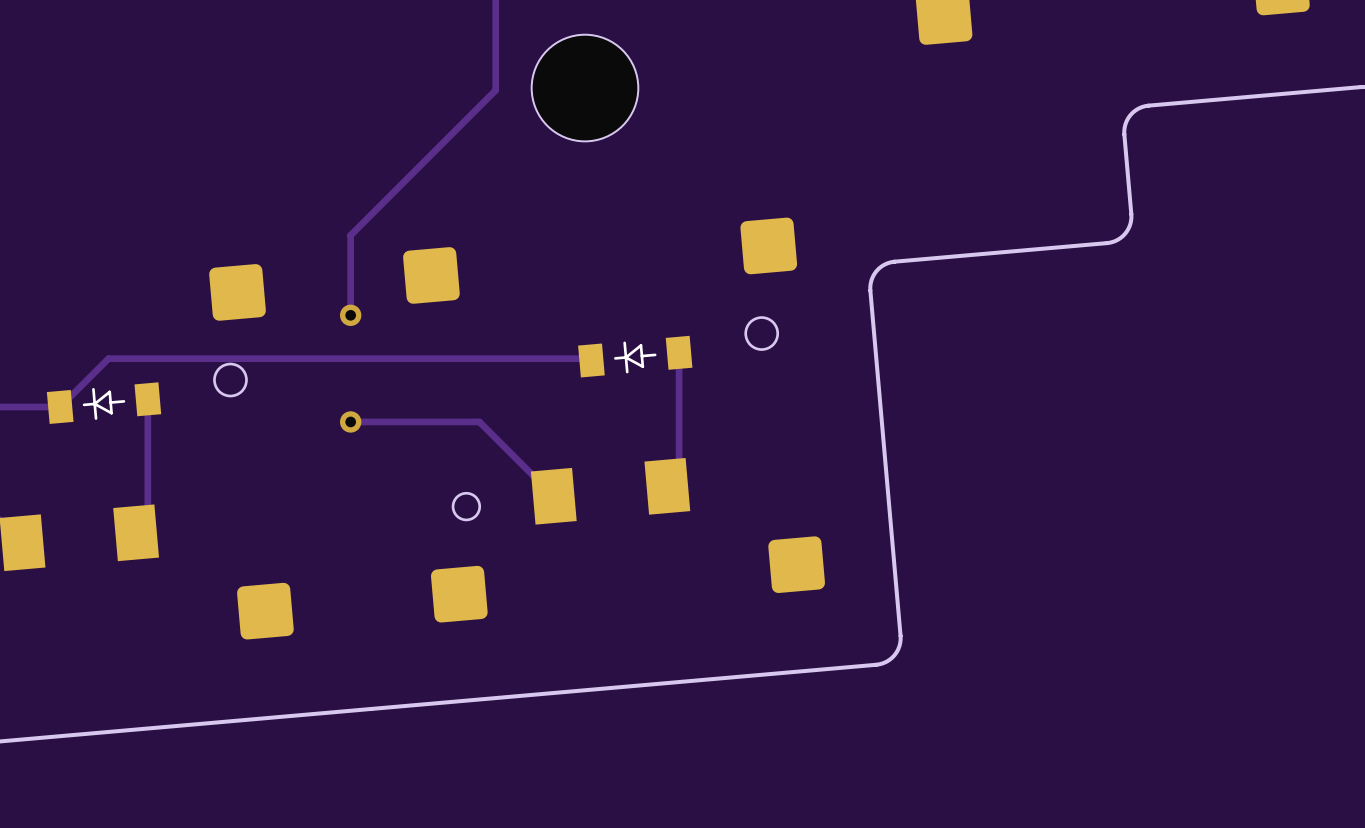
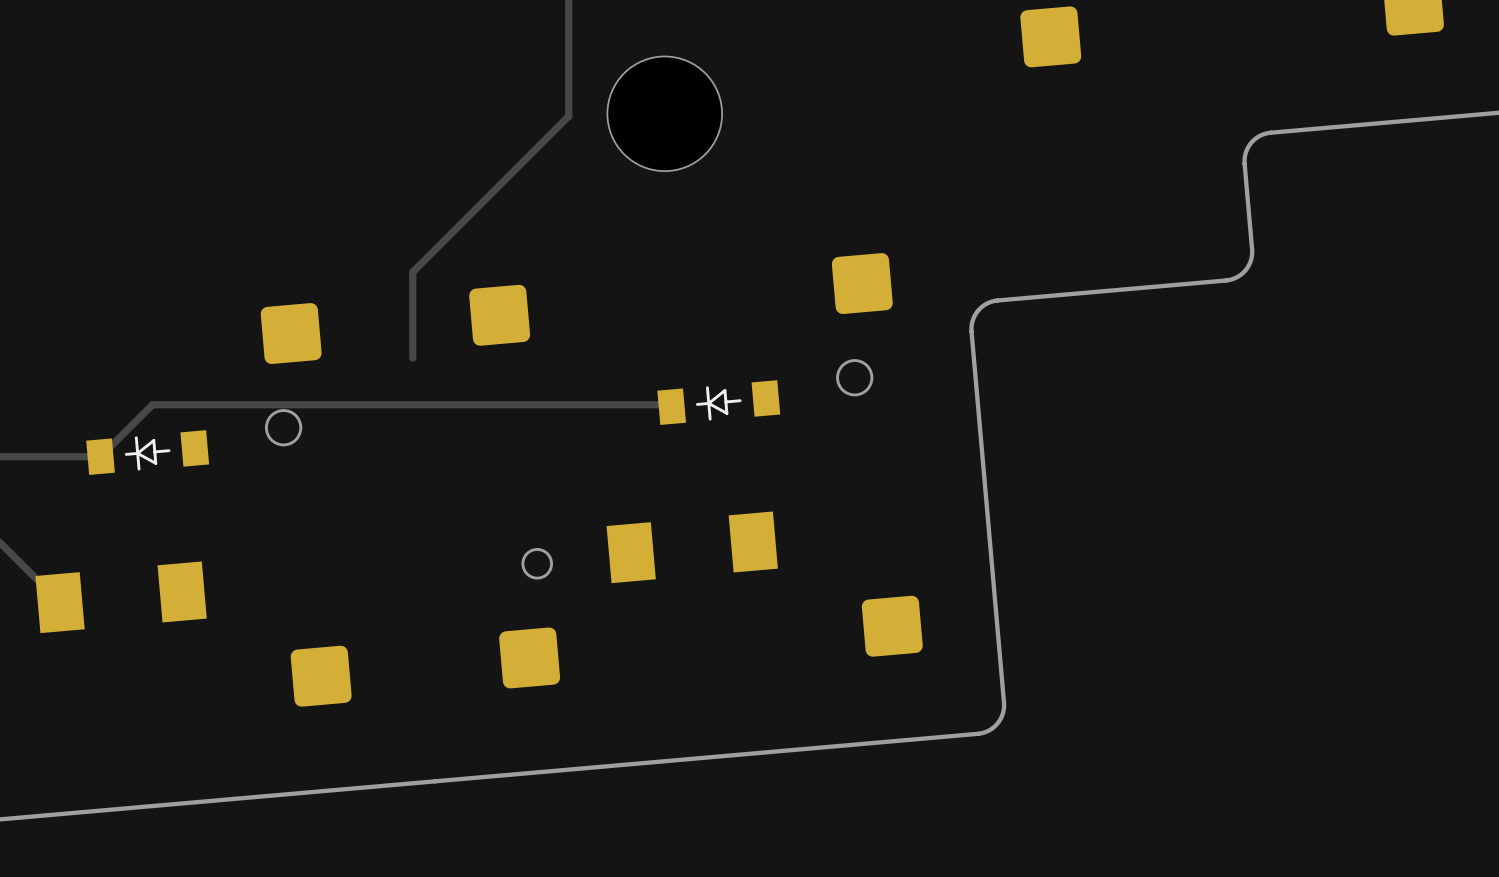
via: (350, 315) -> none
track: (679, 352) (679, 474) (667, 486) -> none
track: (147, 399) (147, 521) (136, 532) -> none
track: (350, 421) (479, 421) (553, 496) -> none
via: (350, 421) -> none

